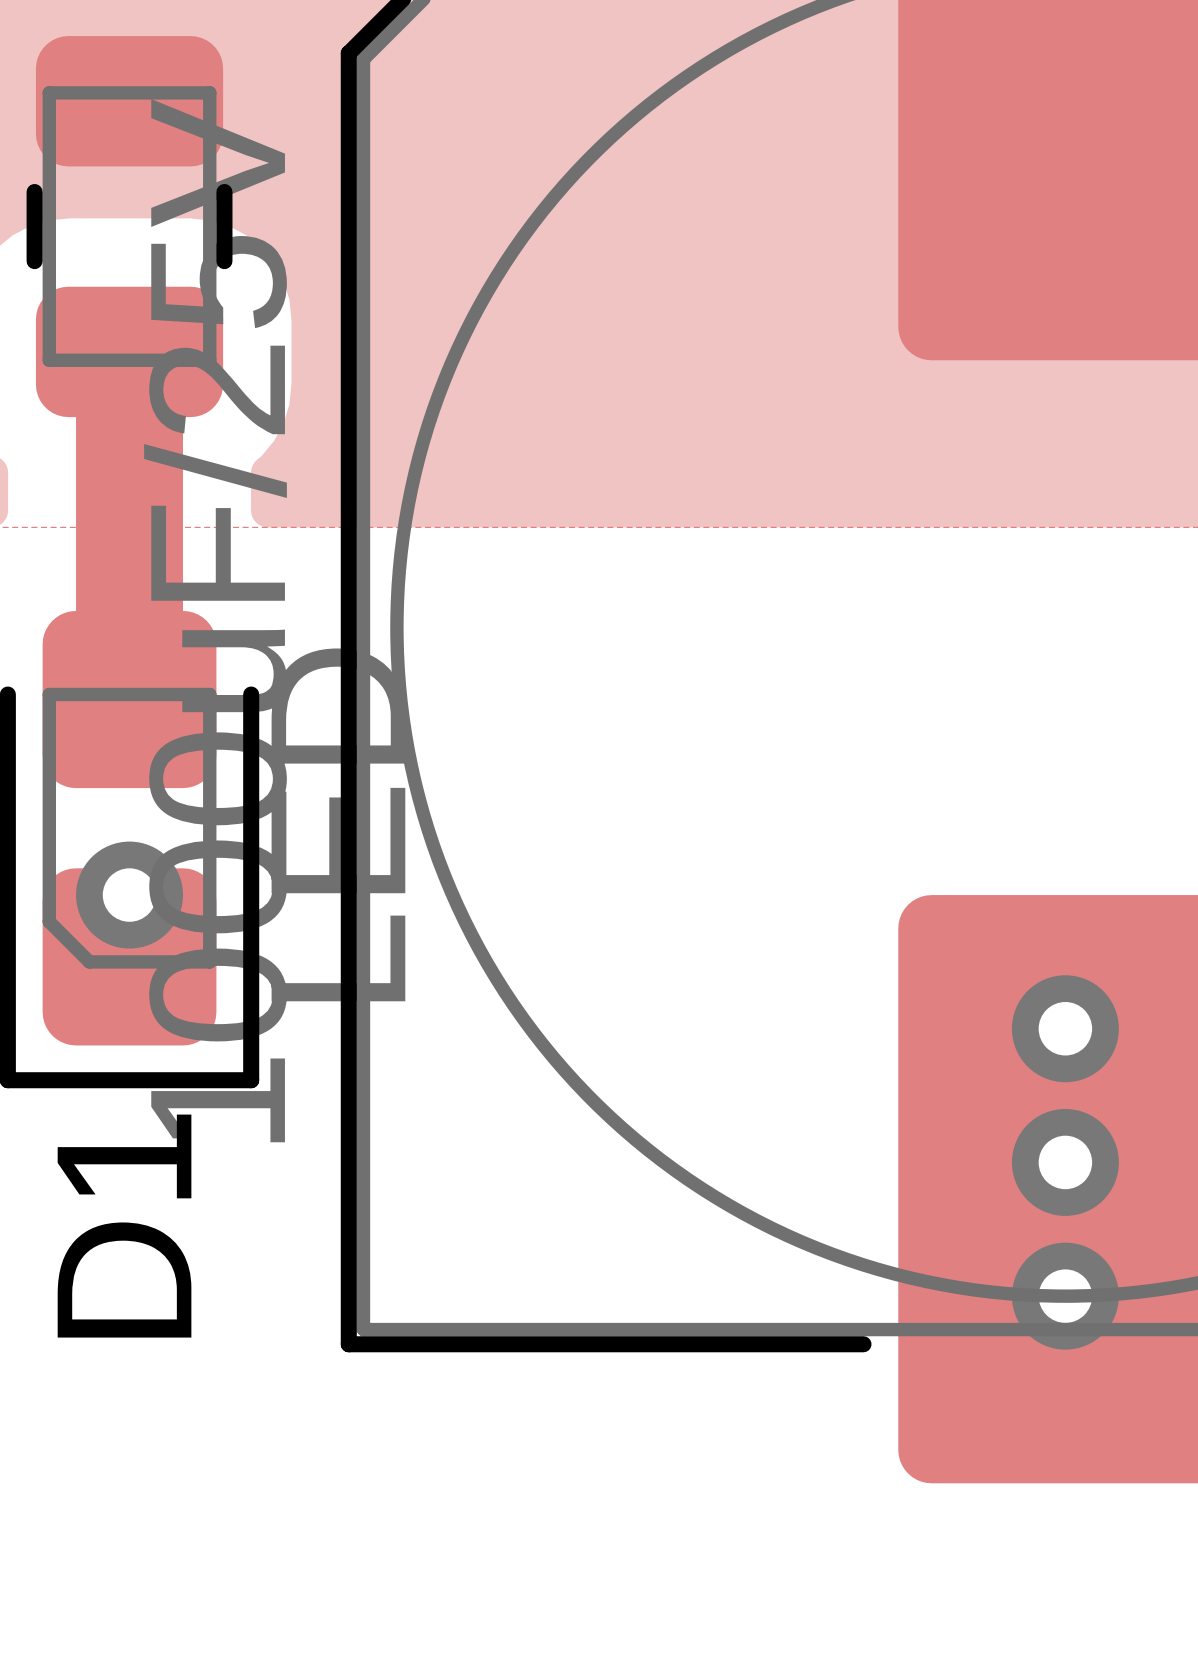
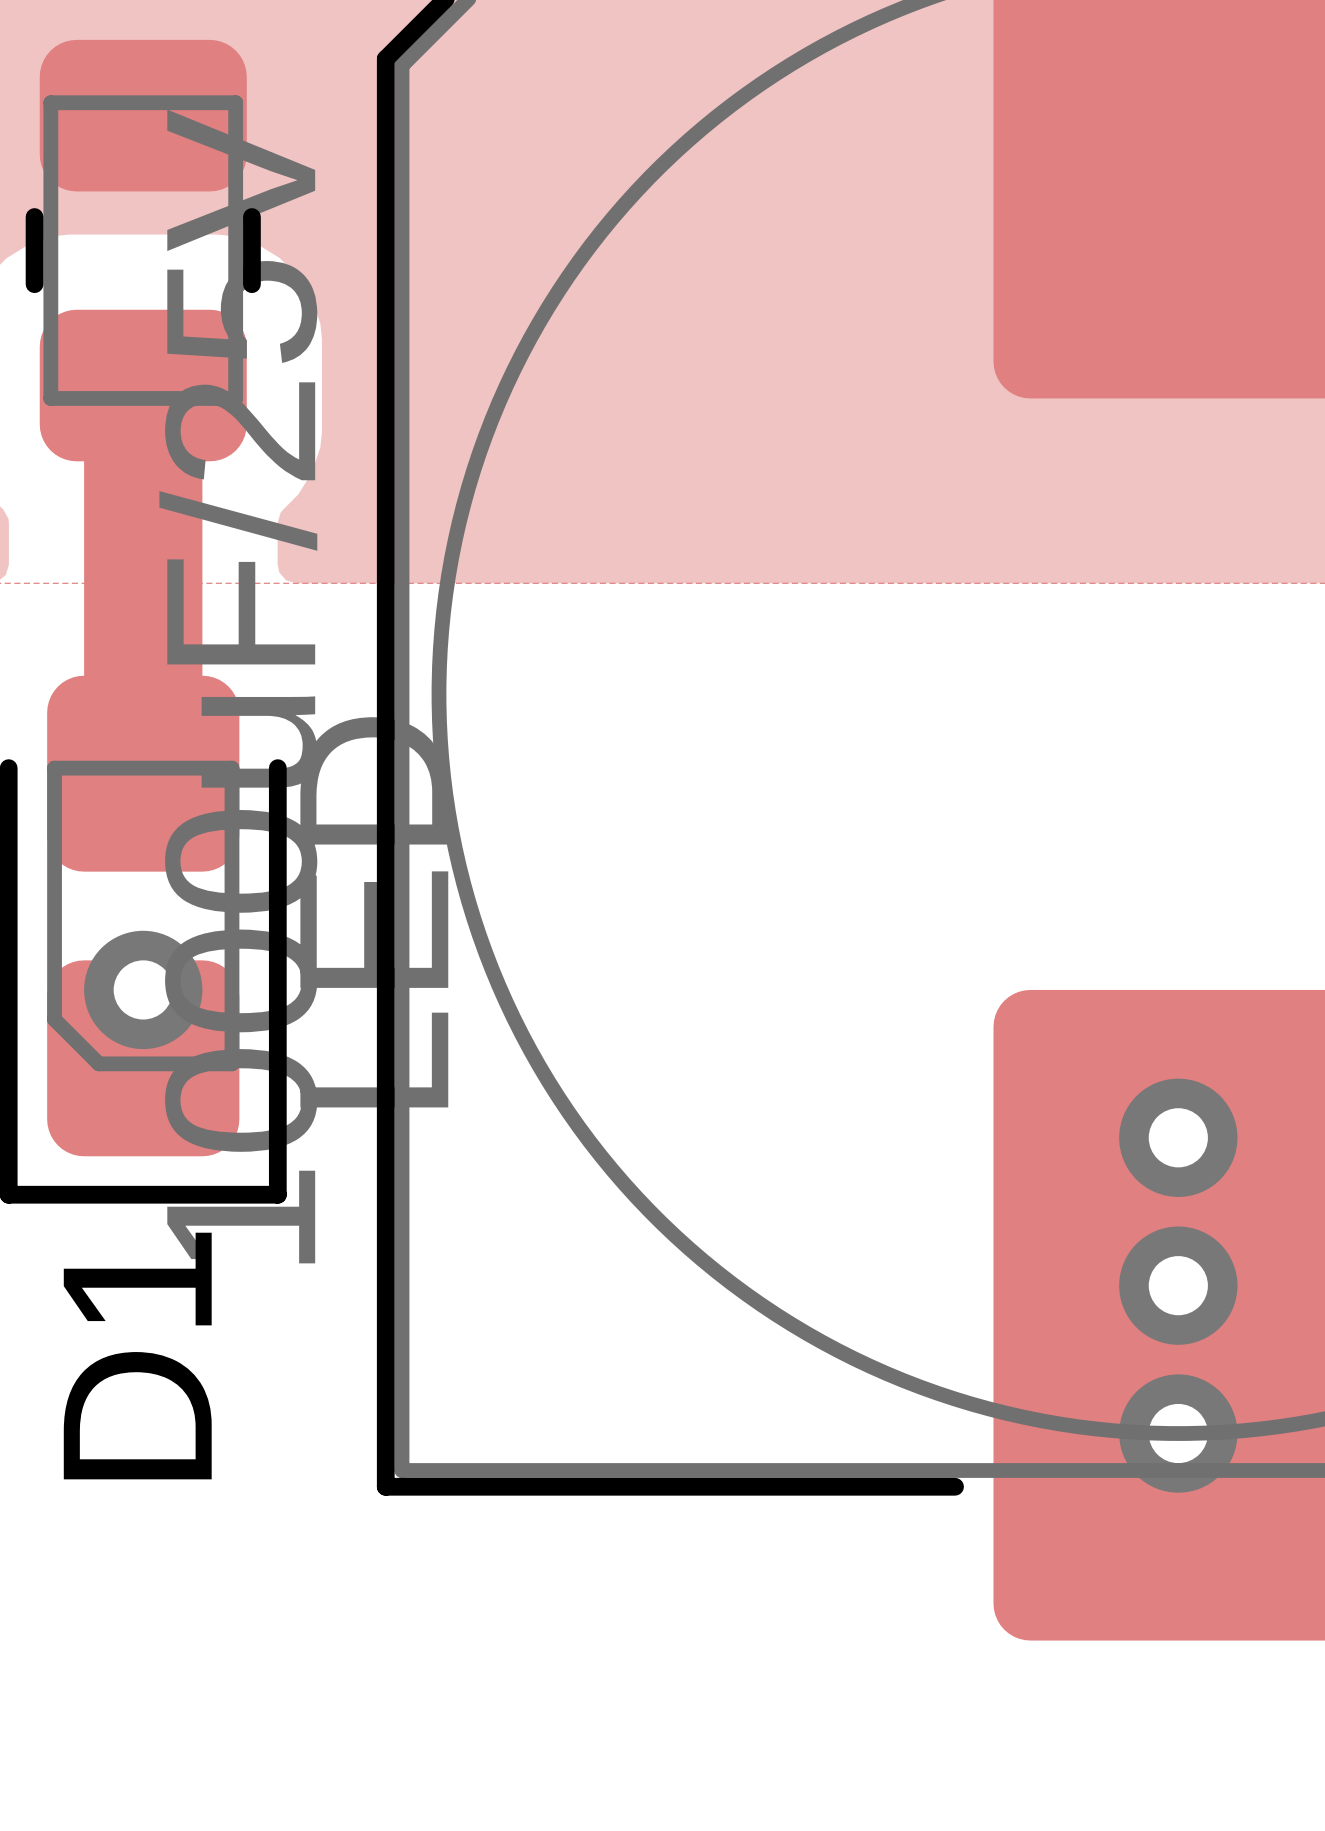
part footprint: [26, 36, 233, 418] -> [25, 39, 261, 462]

